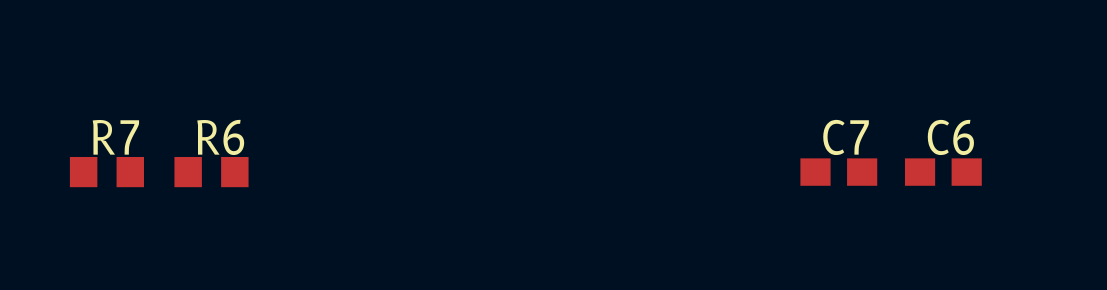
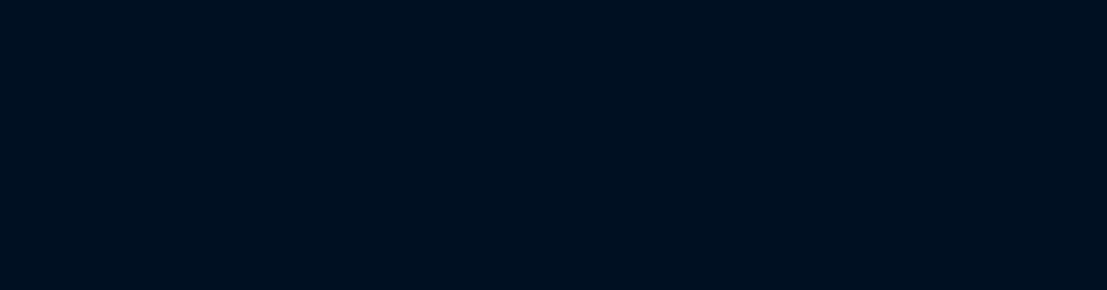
R7: (106, 172) -> none
R6: (211, 172) -> none
C7: (838, 172) -> none
C6: (943, 172) -> none

